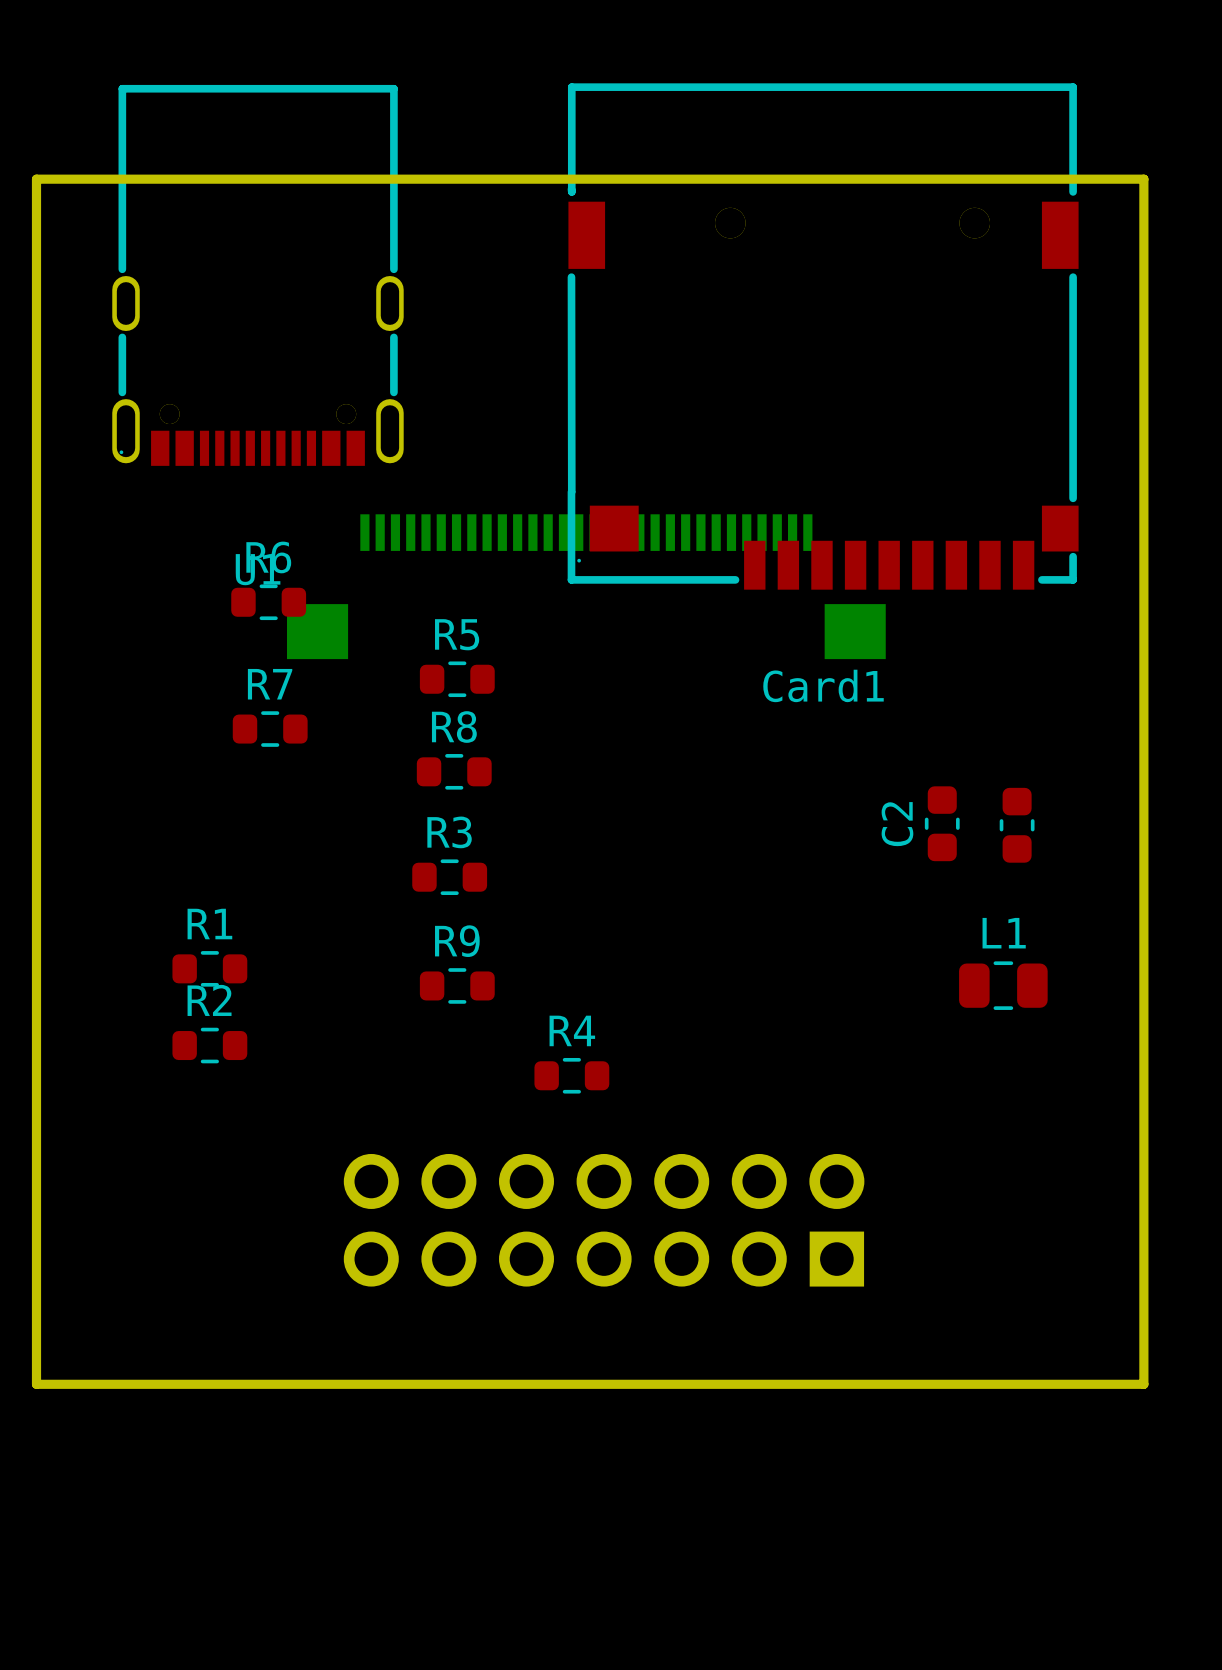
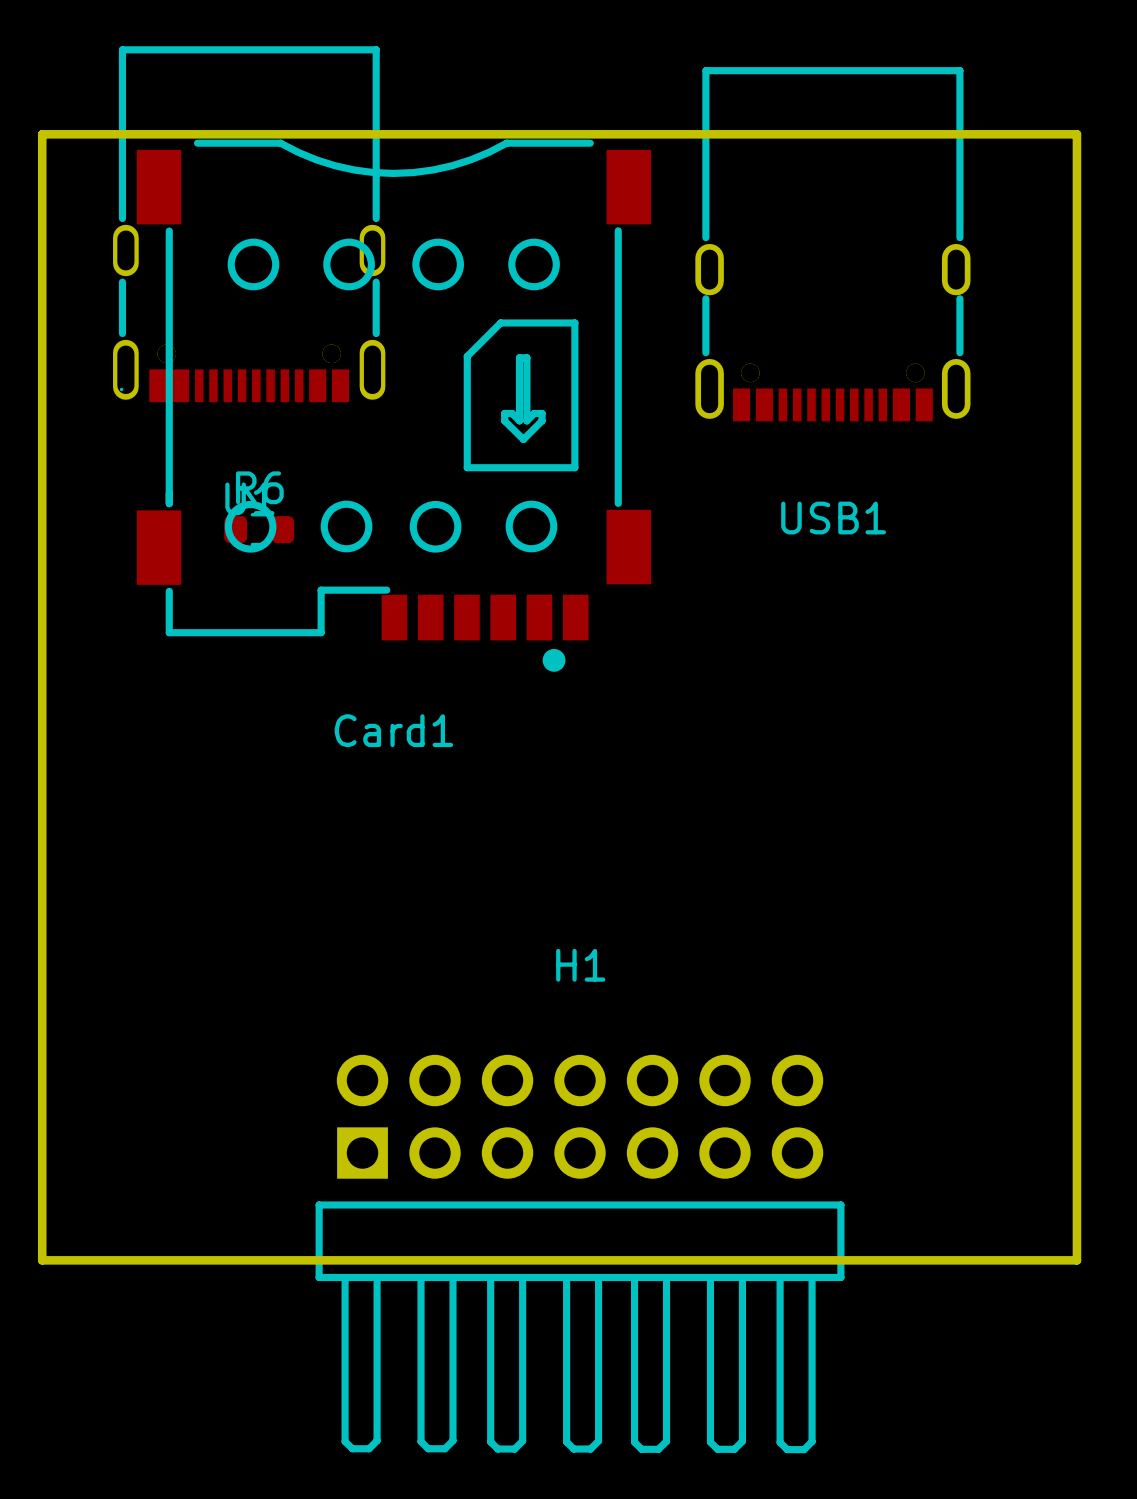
Card1 footprint: [567, 83, 1079, 590] -> [136, 139, 652, 672]
USB1: none -> (832, 244)
part: (586, 586) -> none
R5: (457, 679) -> none
R7: (270, 729) -> none
R8: (454, 771) -> none
C2: (942, 823) -> none
part: (1017, 825) -> none
R3: (449, 877) -> none
R1: (209, 968) -> none
R9: (457, 985) -> none
L1: (1003, 985) -> none
R2: (209, 1045) -> none
R4: (571, 1075) -> none
part: (604, 1220) -> none
H1: none -> (580, 1254)

